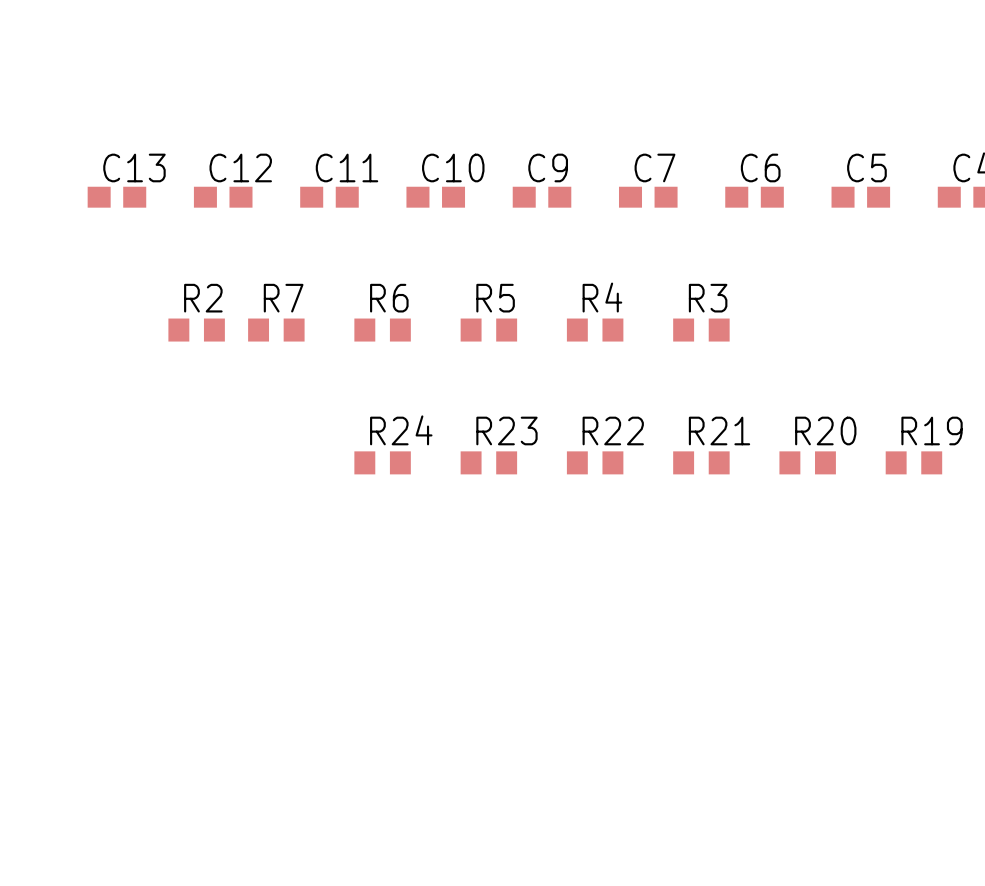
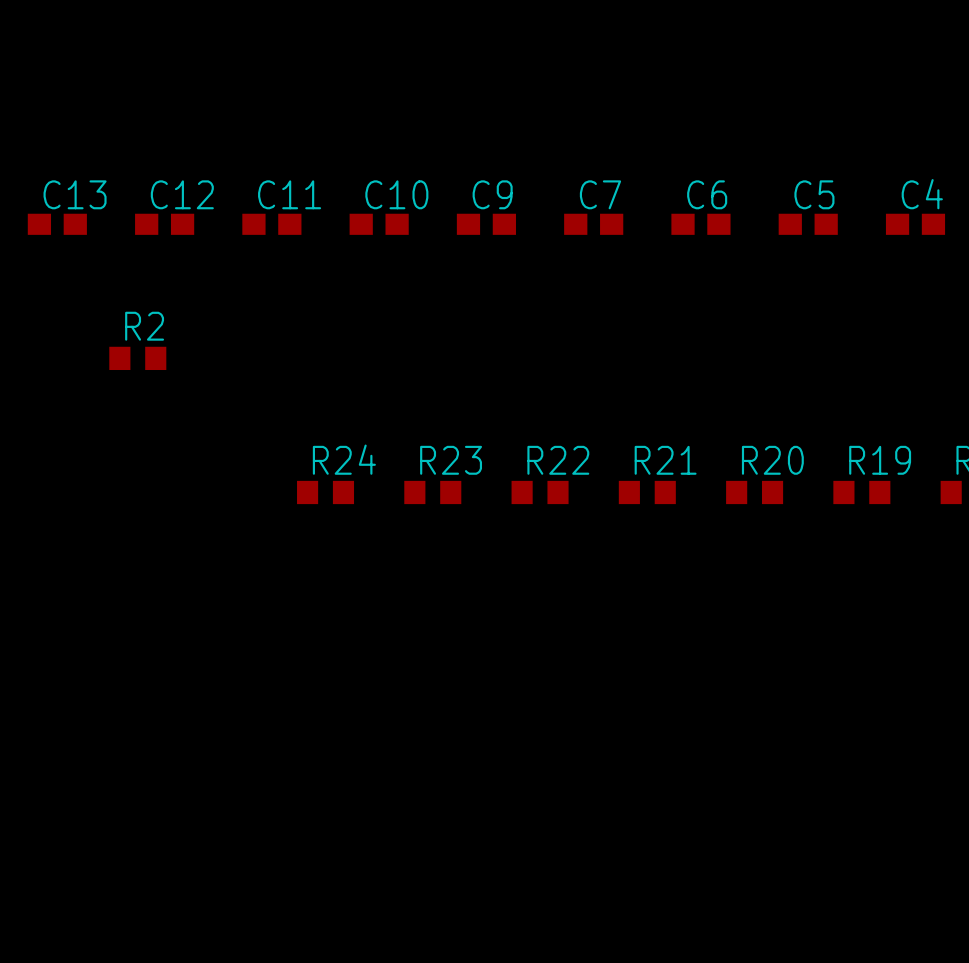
R7: (276, 330) -> none
R6: (382, 330) -> none
R5: (488, 330) -> none
R4: (595, 330) -> none
R3: (701, 330) -> none

